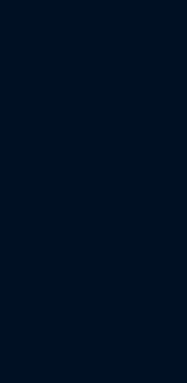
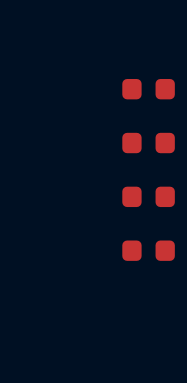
part: none -> (148, 89)
part: none -> (148, 143)
part: none -> (148, 196)
part: none -> (148, 250)

